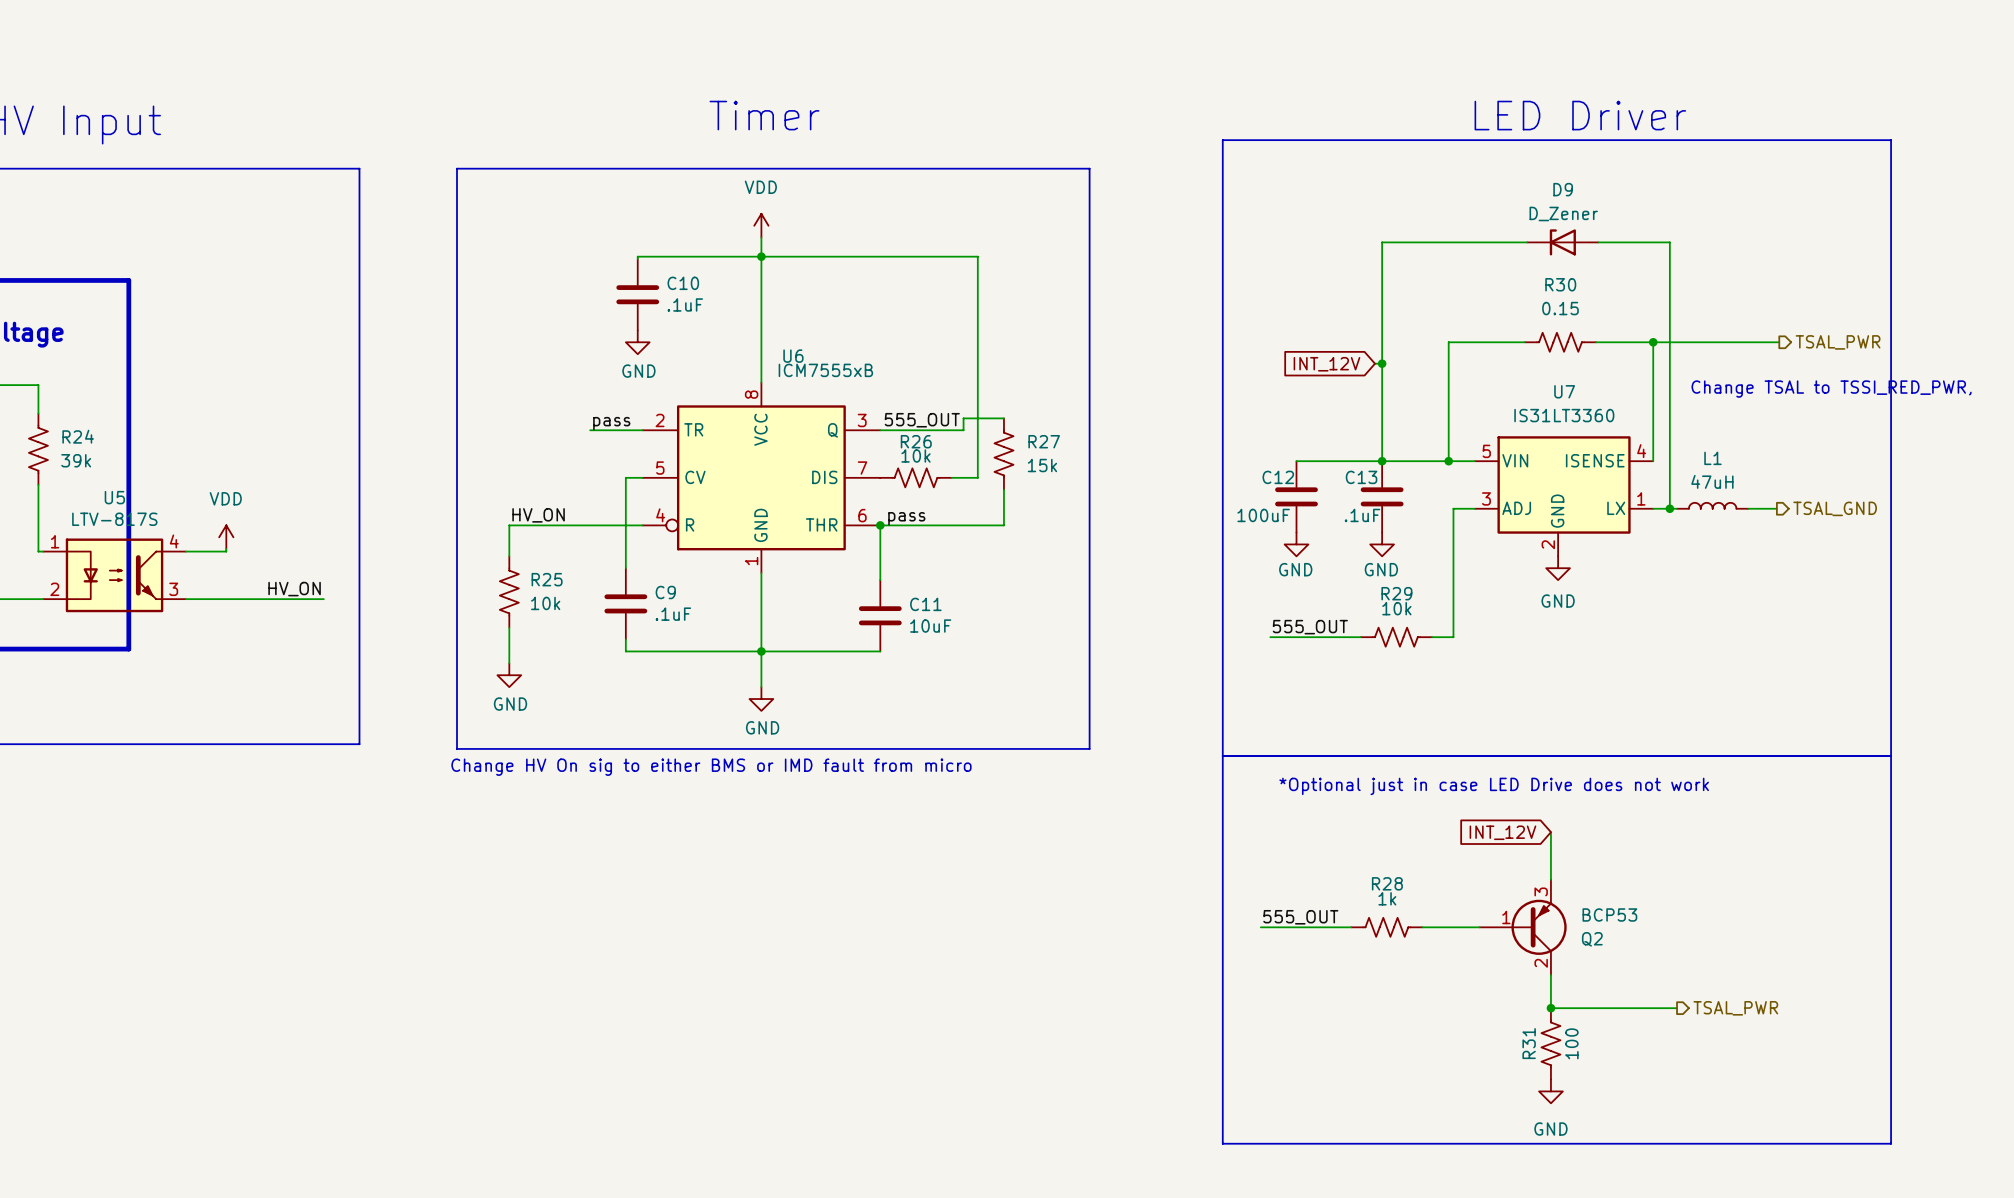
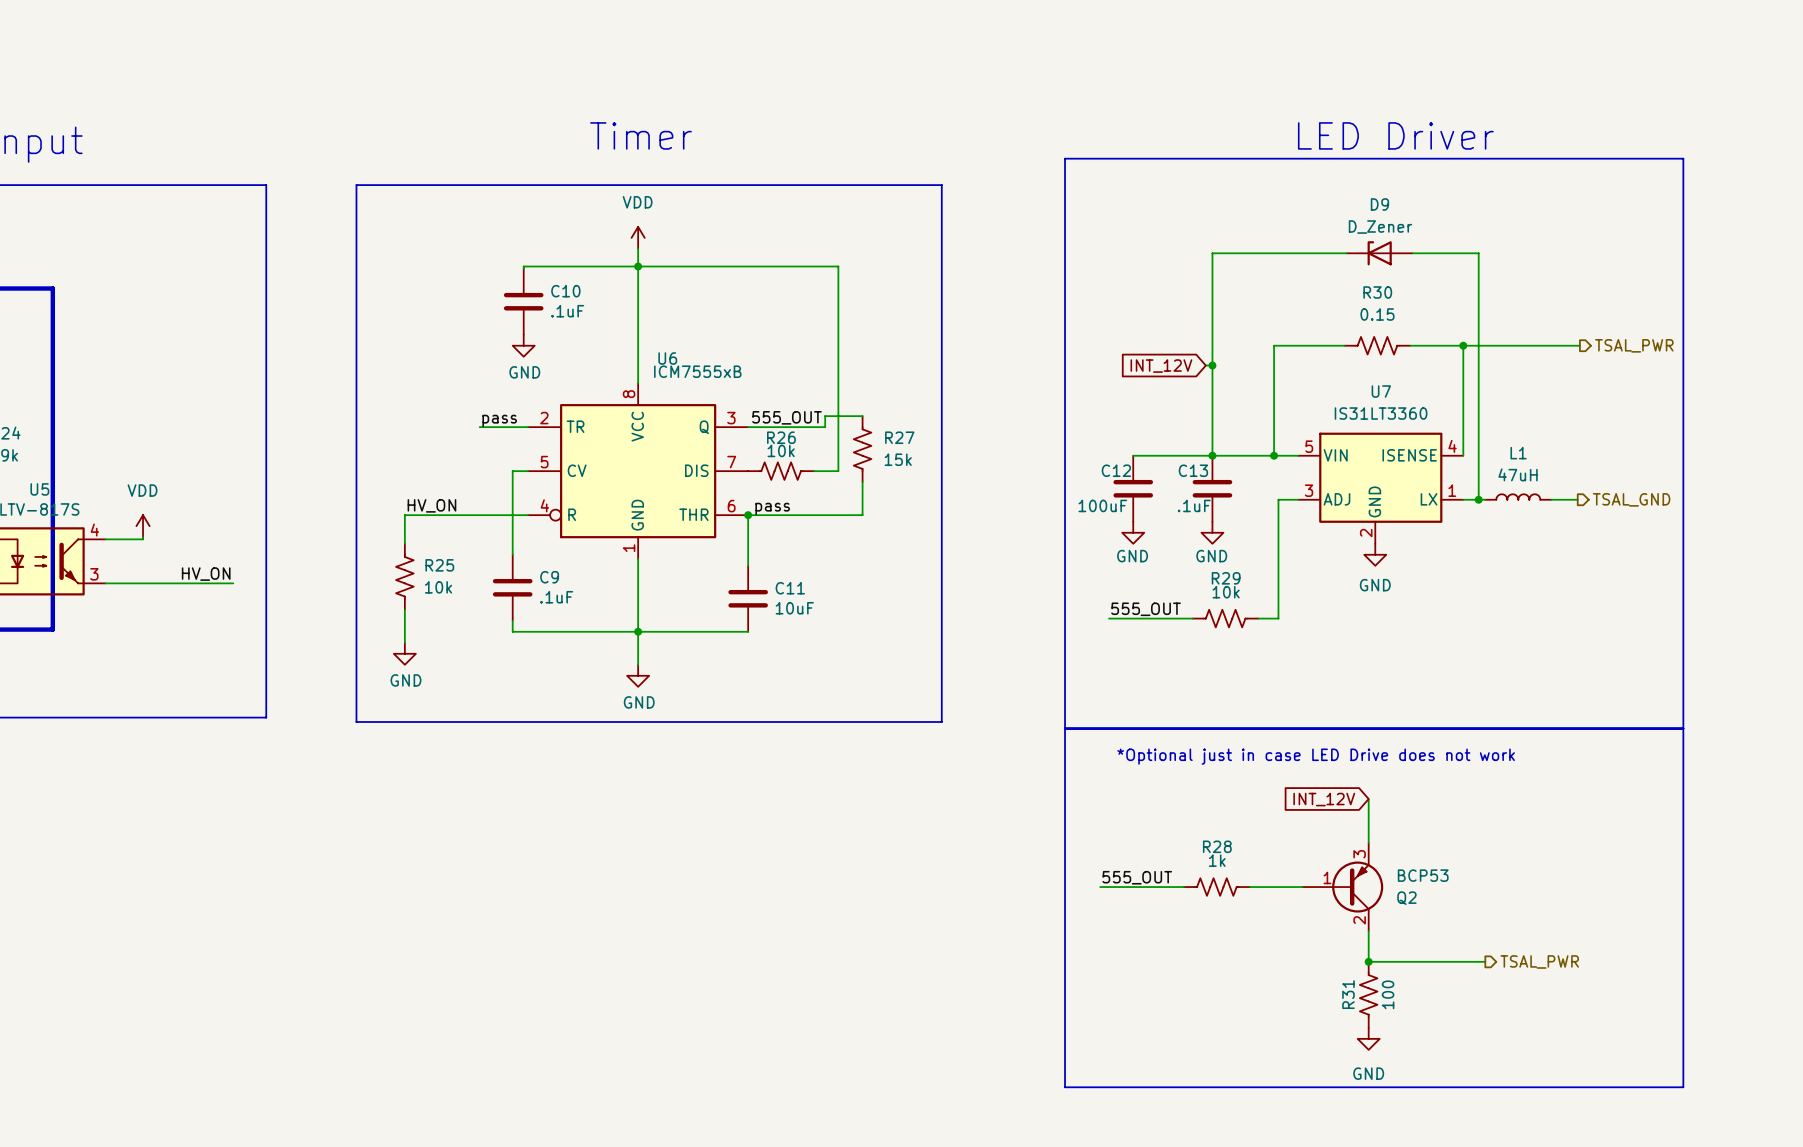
text: Change TSAL to TSSI_RED_PWR, (1831, 389) -> none
text: Change HV On sig to either BMS or IMD fault from micro (711, 767) -> none

